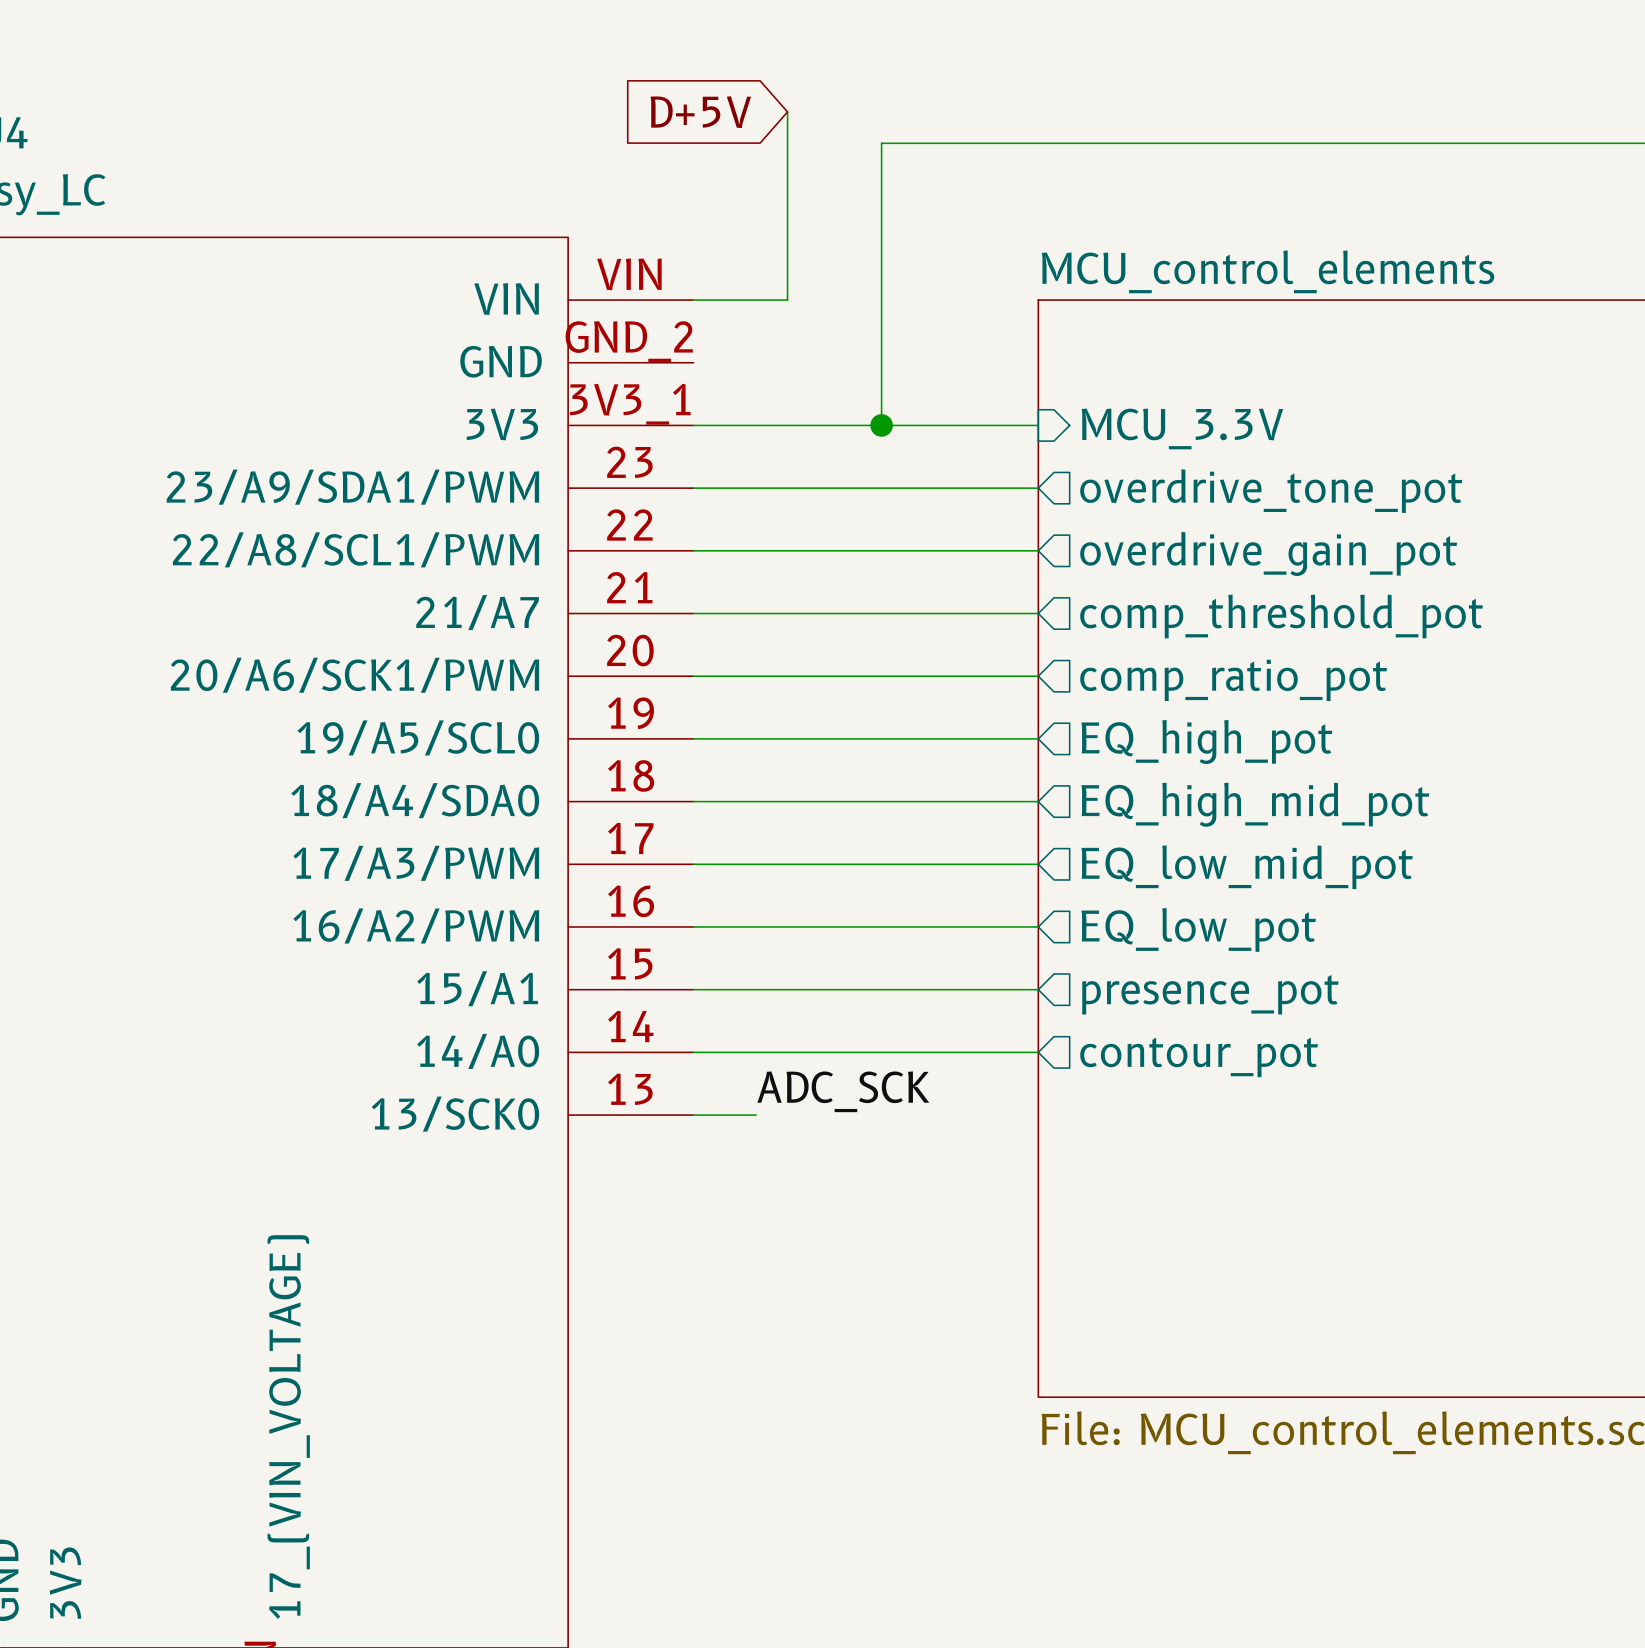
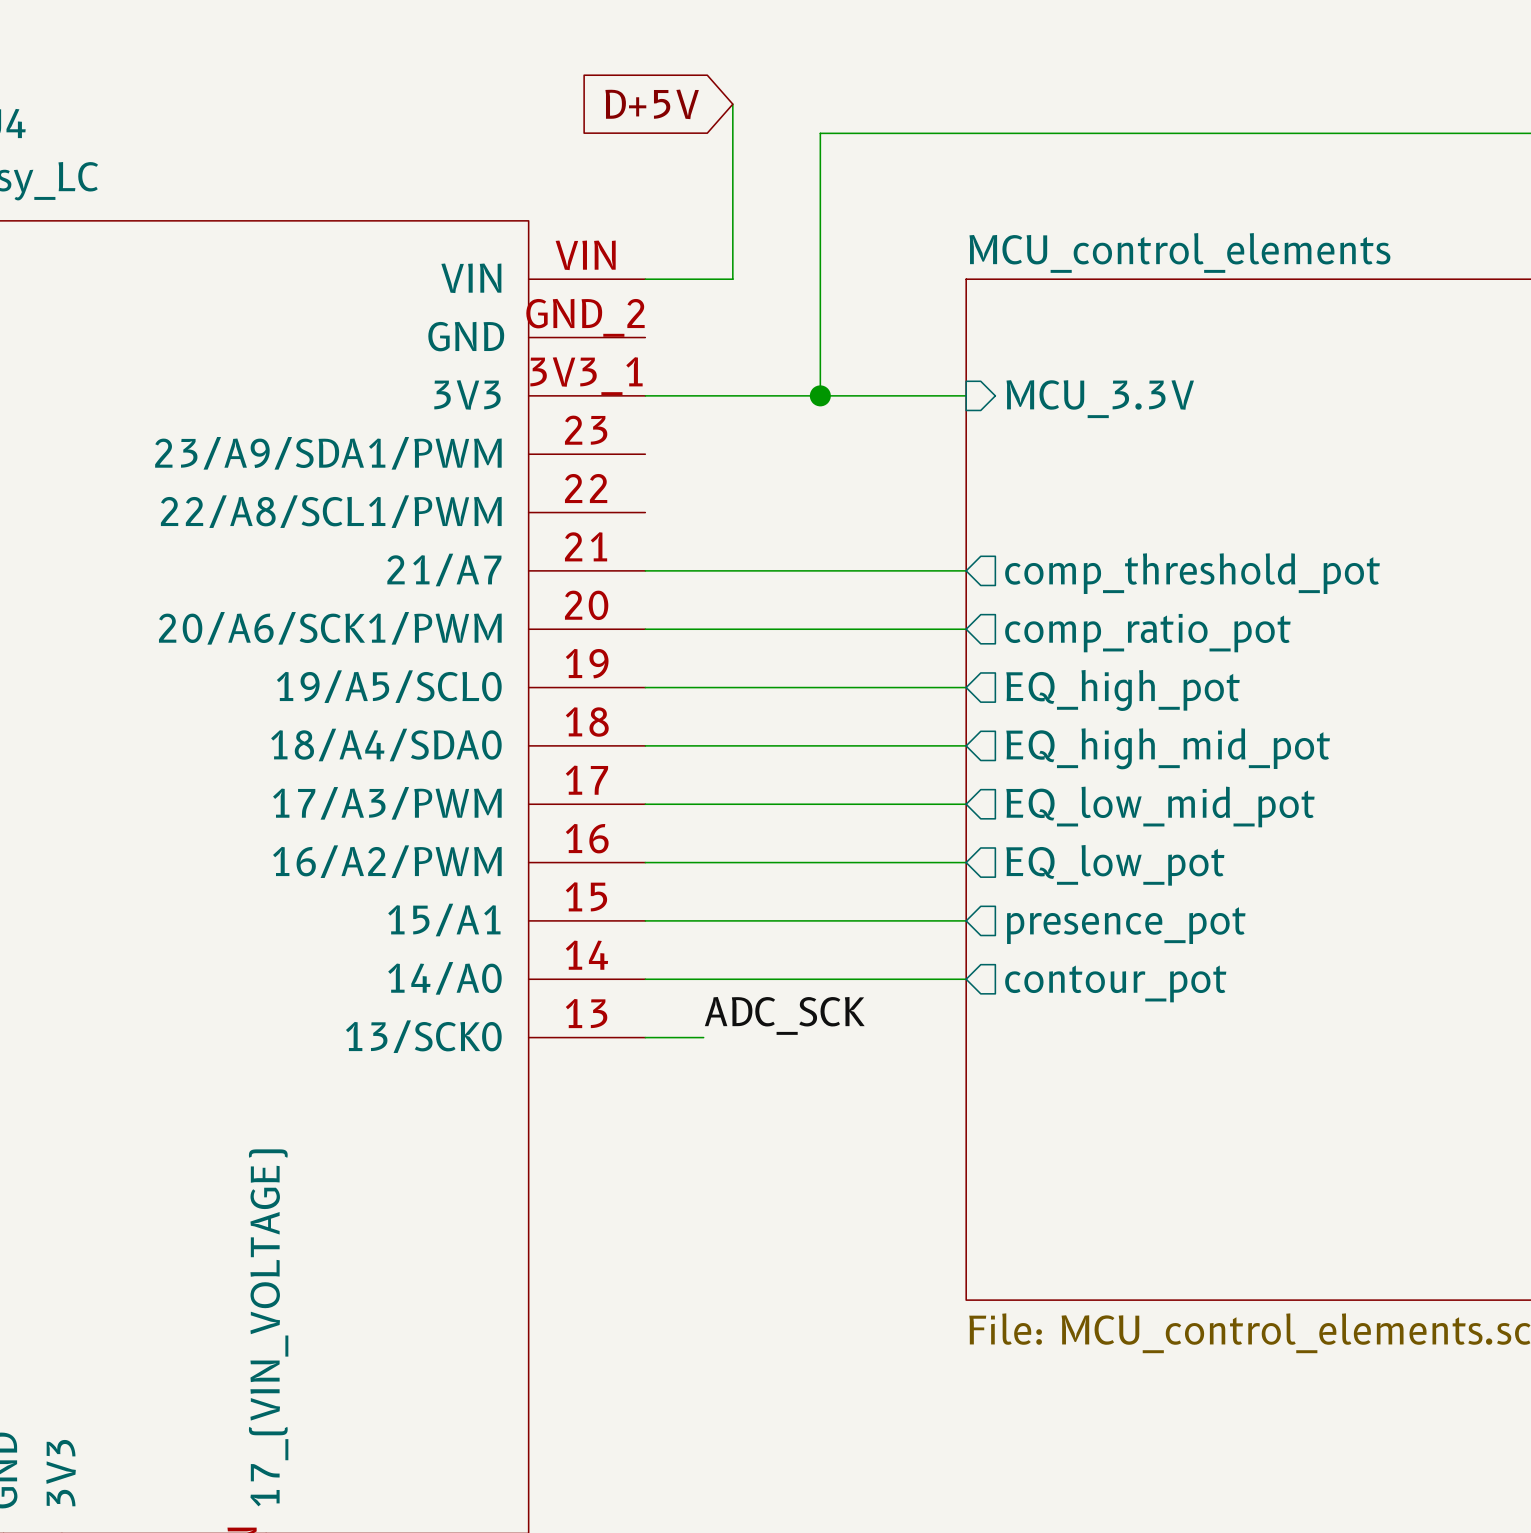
wire: (693, 488) (1038, 488) -> none
sheet pin: overdrive_tone_pot (1271, 491) -> none
wire: (693, 550) (1038, 550) -> none
sheet pin: overdrive_gain_pot (1268, 553) -> none

